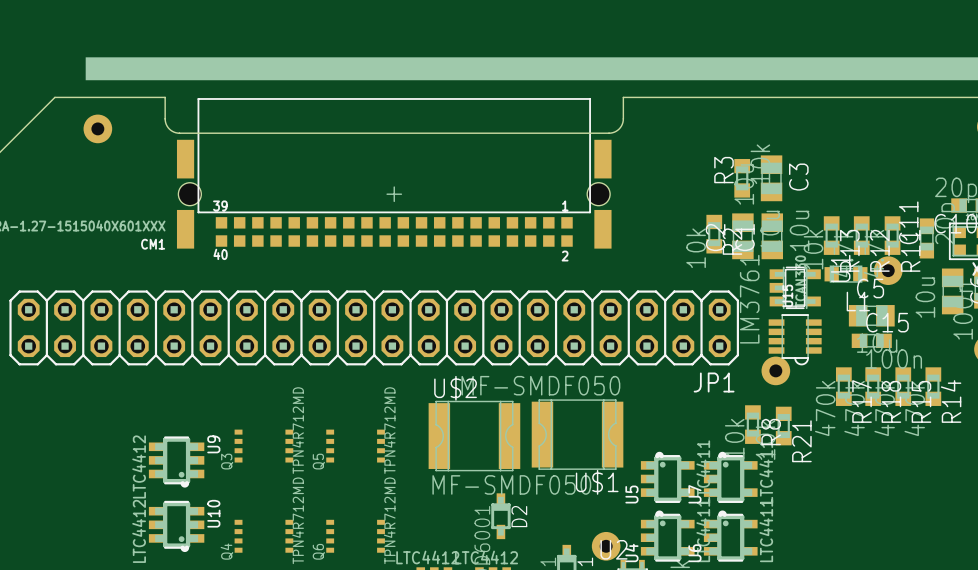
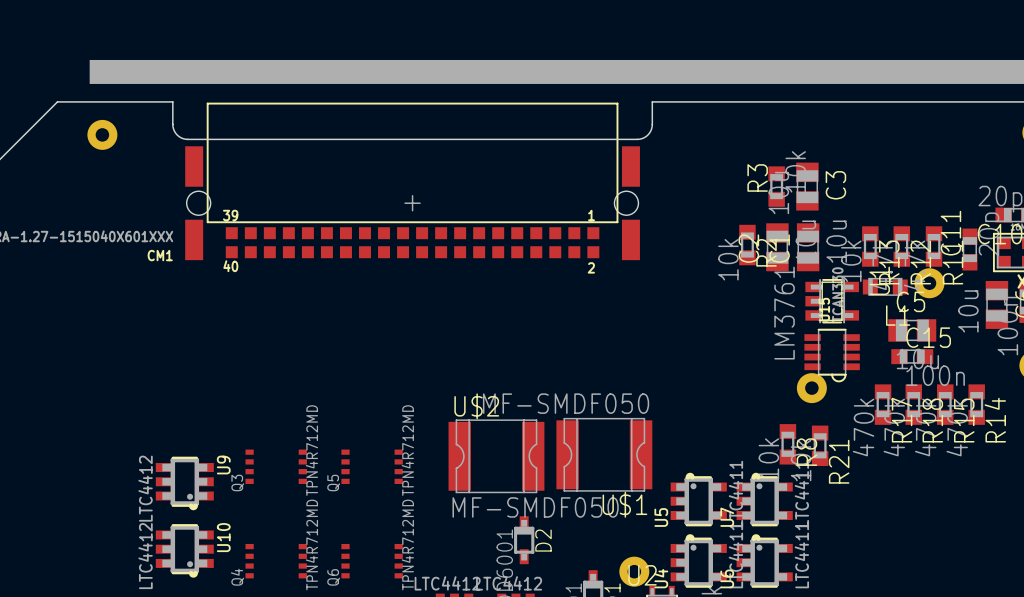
JP1: (374, 327) -> none

